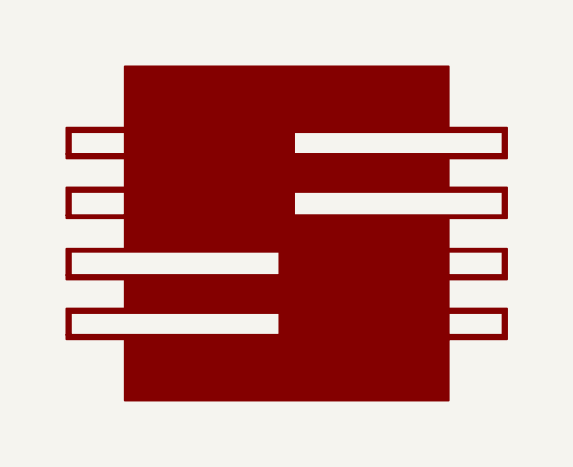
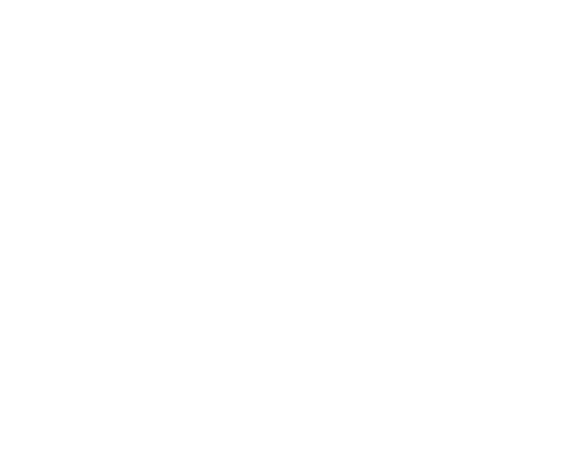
power symbol: (286, 233) -> none

